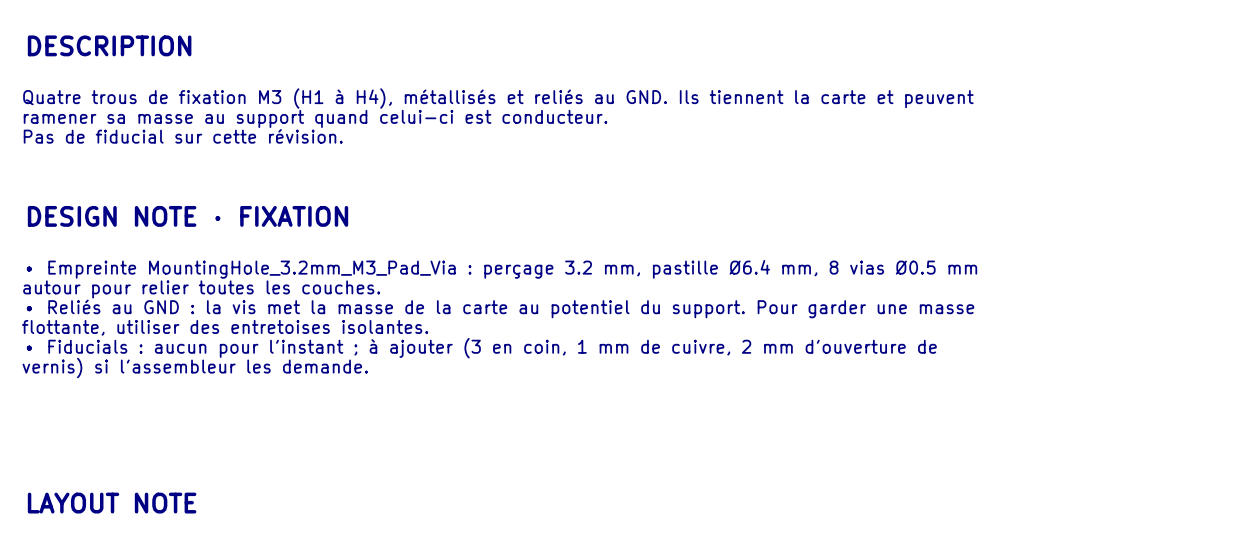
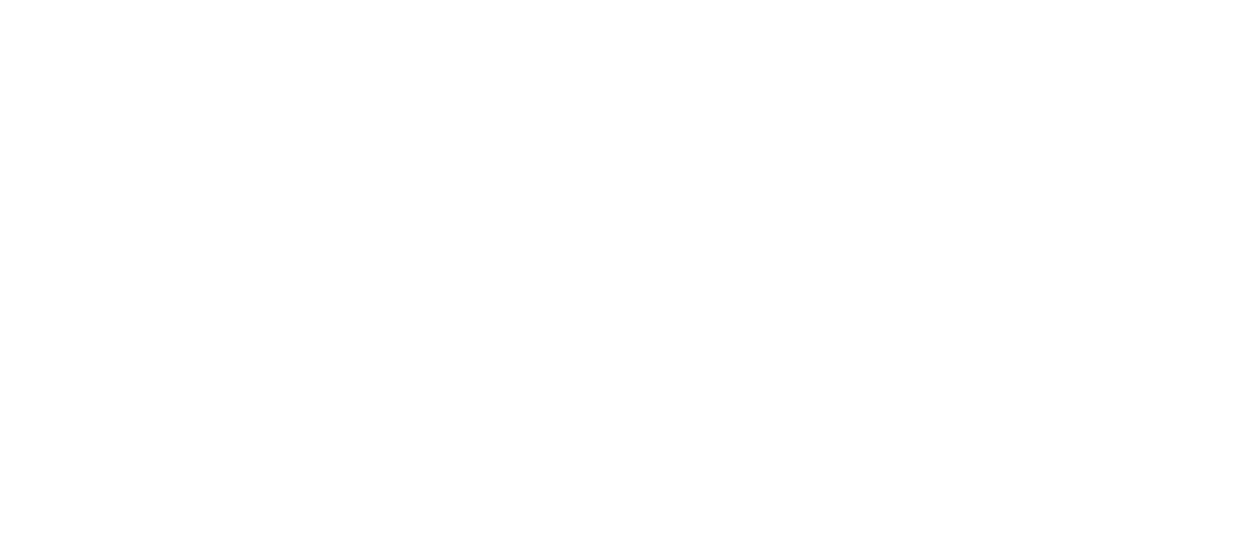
text: DESCRIPTION (109, 45) -> none
text: Quatre trous de fixation M3 (H1 à H4), métallisés et reliés au GND. Ils tiennent la carte et peuvent (498, 98) -> none
text: ramener sa masse au support quand celui-ci est conducteur. (315, 118) -> none
text: Pas de fiducial sur cette révision. (183, 136) -> none
text: DESIGN NOTE · FIXATION (188, 216) -> none
text: • Empreinte MountingHole_3.2mm_M3_Pad_Via : perçage 3.2 mm, pastille Ø6.4 mm, 8 vias Ø0.5 mm (501, 269) -> none
text: autour pour relier toutes les couches. (201, 289) -> none
text: • Reliés au GND : la vis met la masse de la carte au potentiel du support. Pour garder une masse (500, 308) -> none
text: flottante, utiliser des entretoises isolantes. (225, 327) -> none
text: • Fiducials : aucun pour l'instant ; à ajouter (3 en coin, 1 mm de cuivre, 2 mm d'ouverture de (481, 348) -> none
text: vernis) si l'assembleur les demande. (195, 368) -> none
text: LAYOUT NOTE (112, 503) -> none

